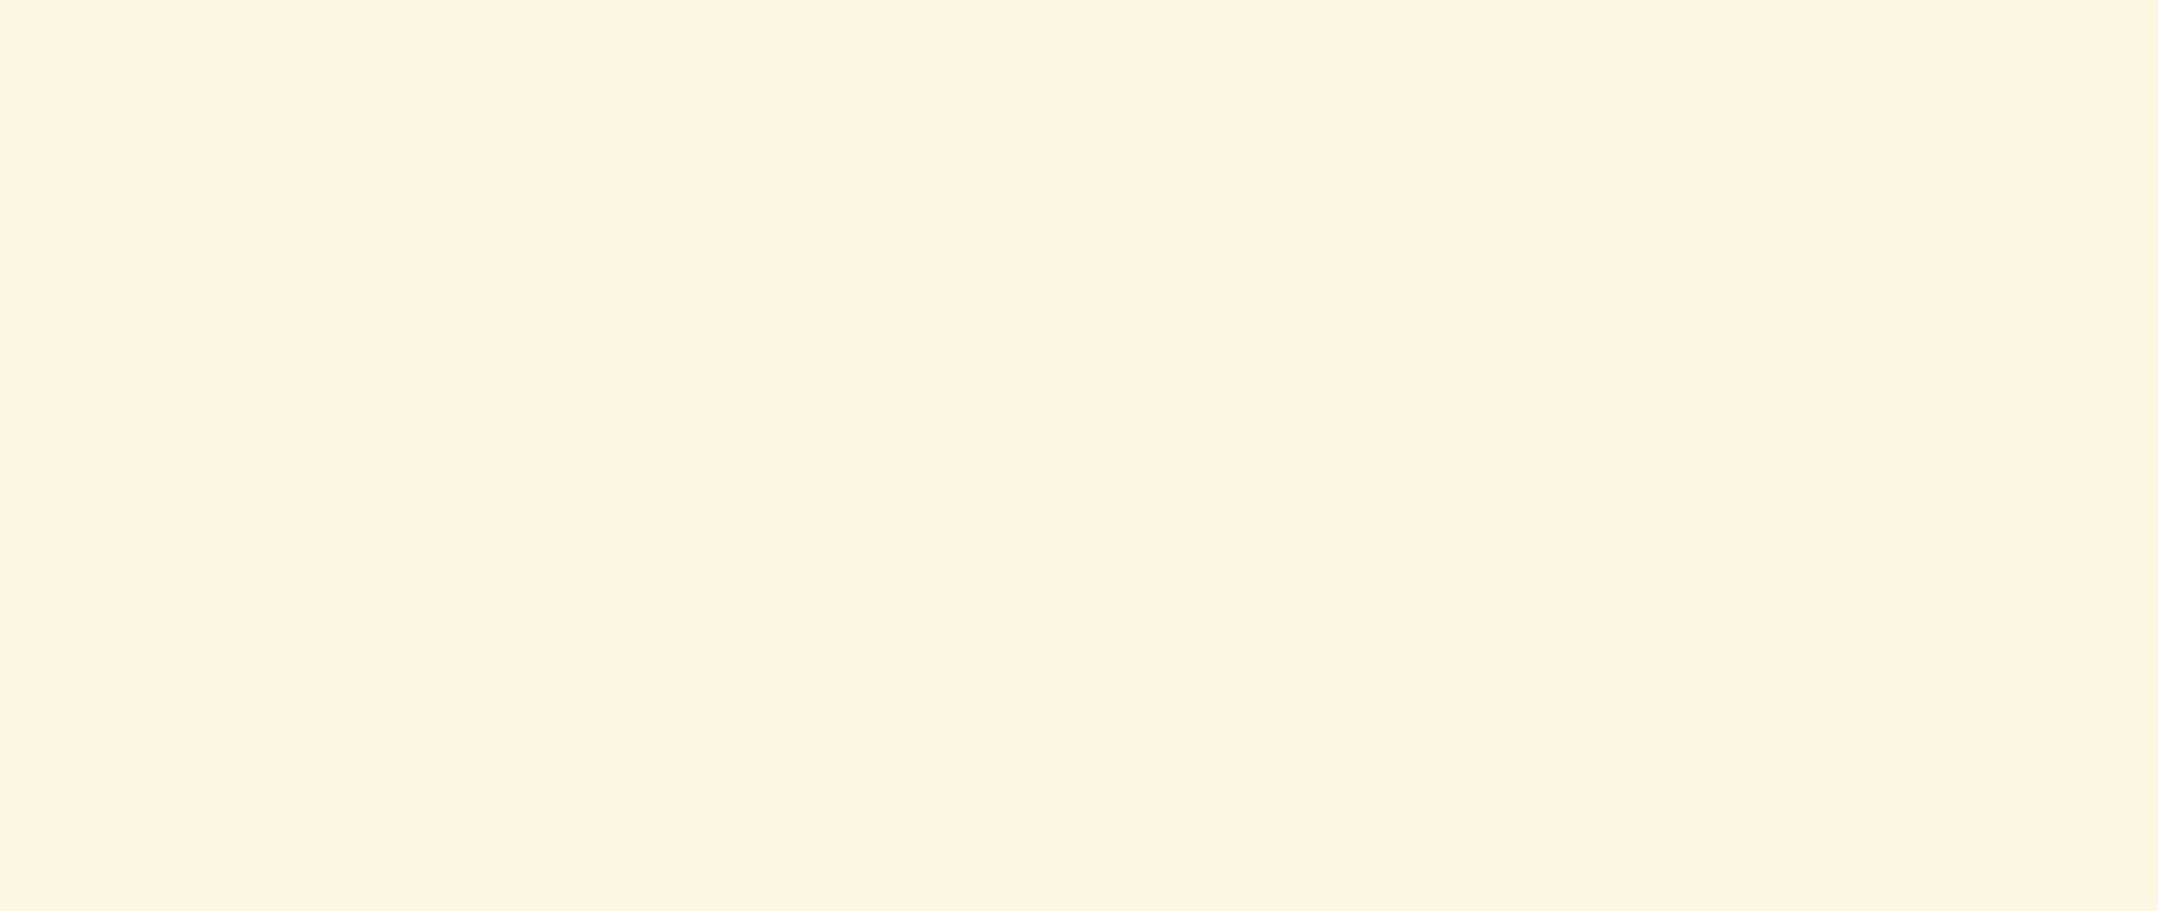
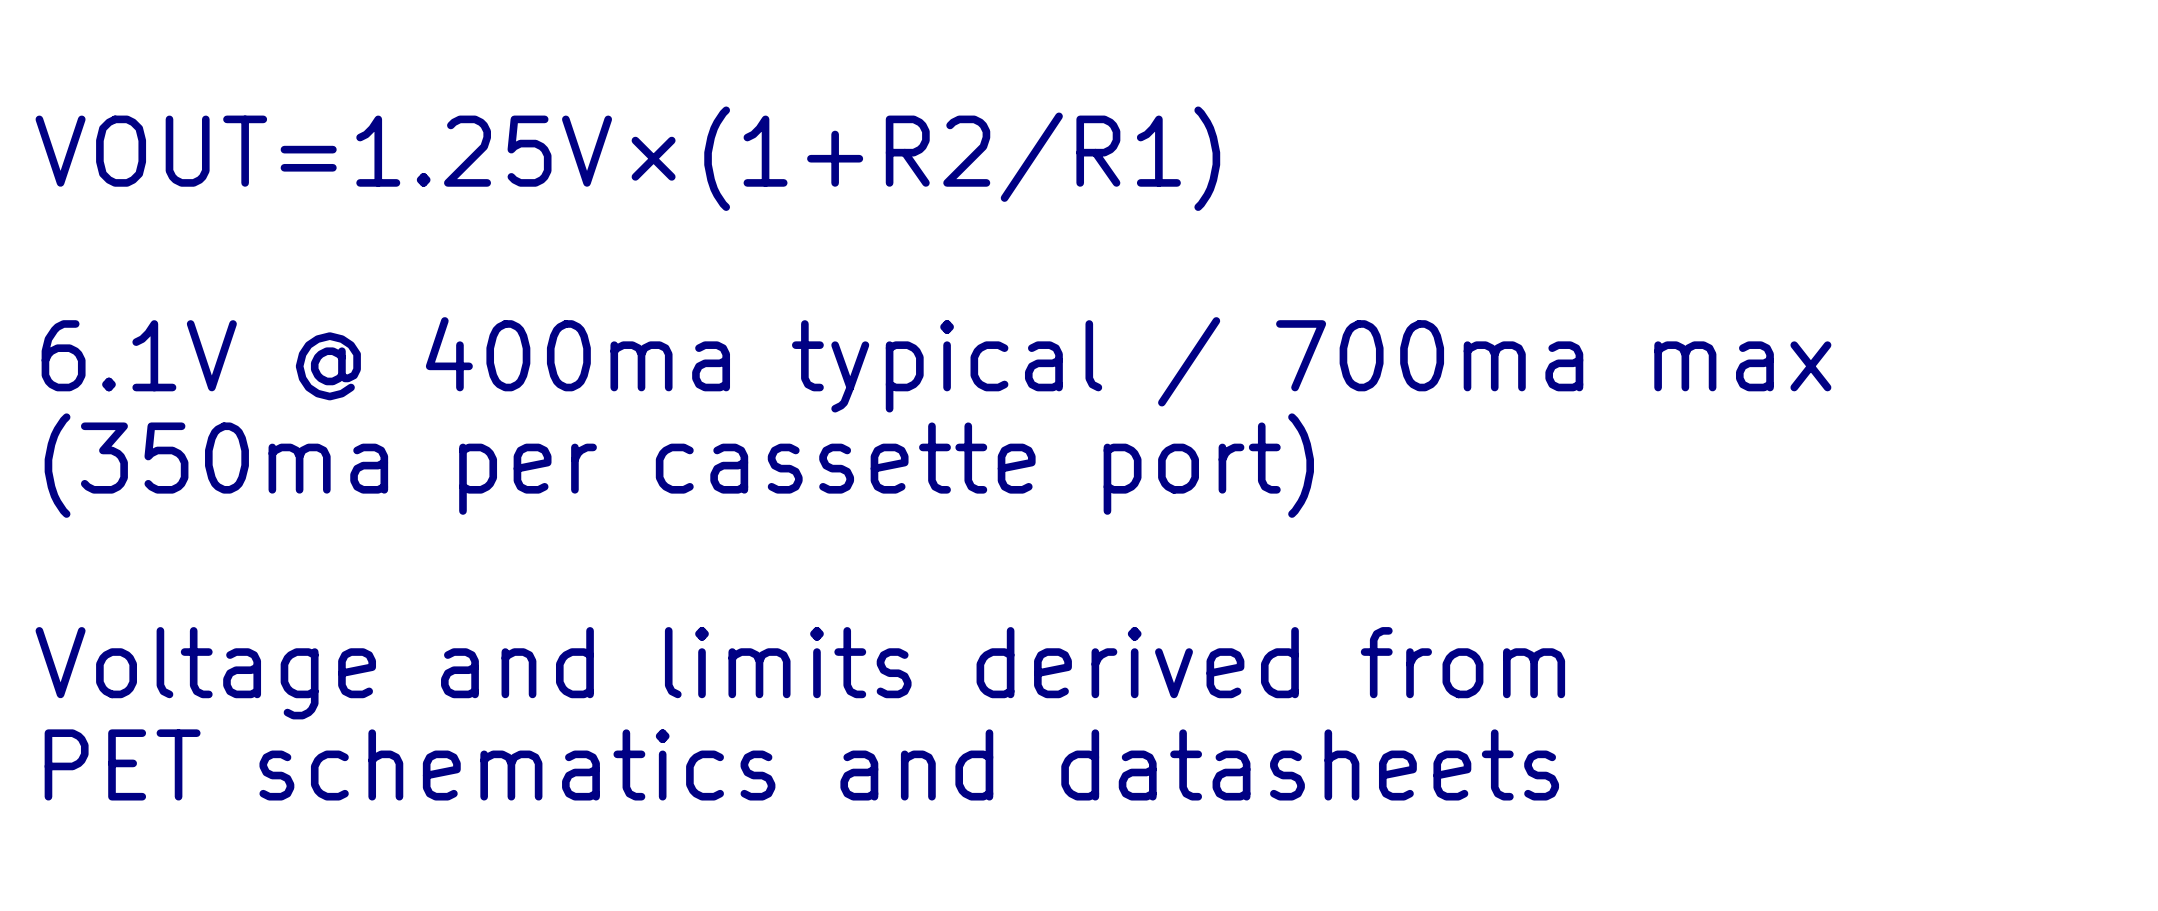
text: none -> VOUT=1.25V×(1+R2/R1) (627, 158)
text: none -> 6.1V @ 400ma typical / 700ma max (936, 364)
text: none -> (350ma per cassette port) (679, 465)
text: none -> Voltage and limits derived from (800, 673)
text: none -> PET schematics and datasheets (801, 764)

